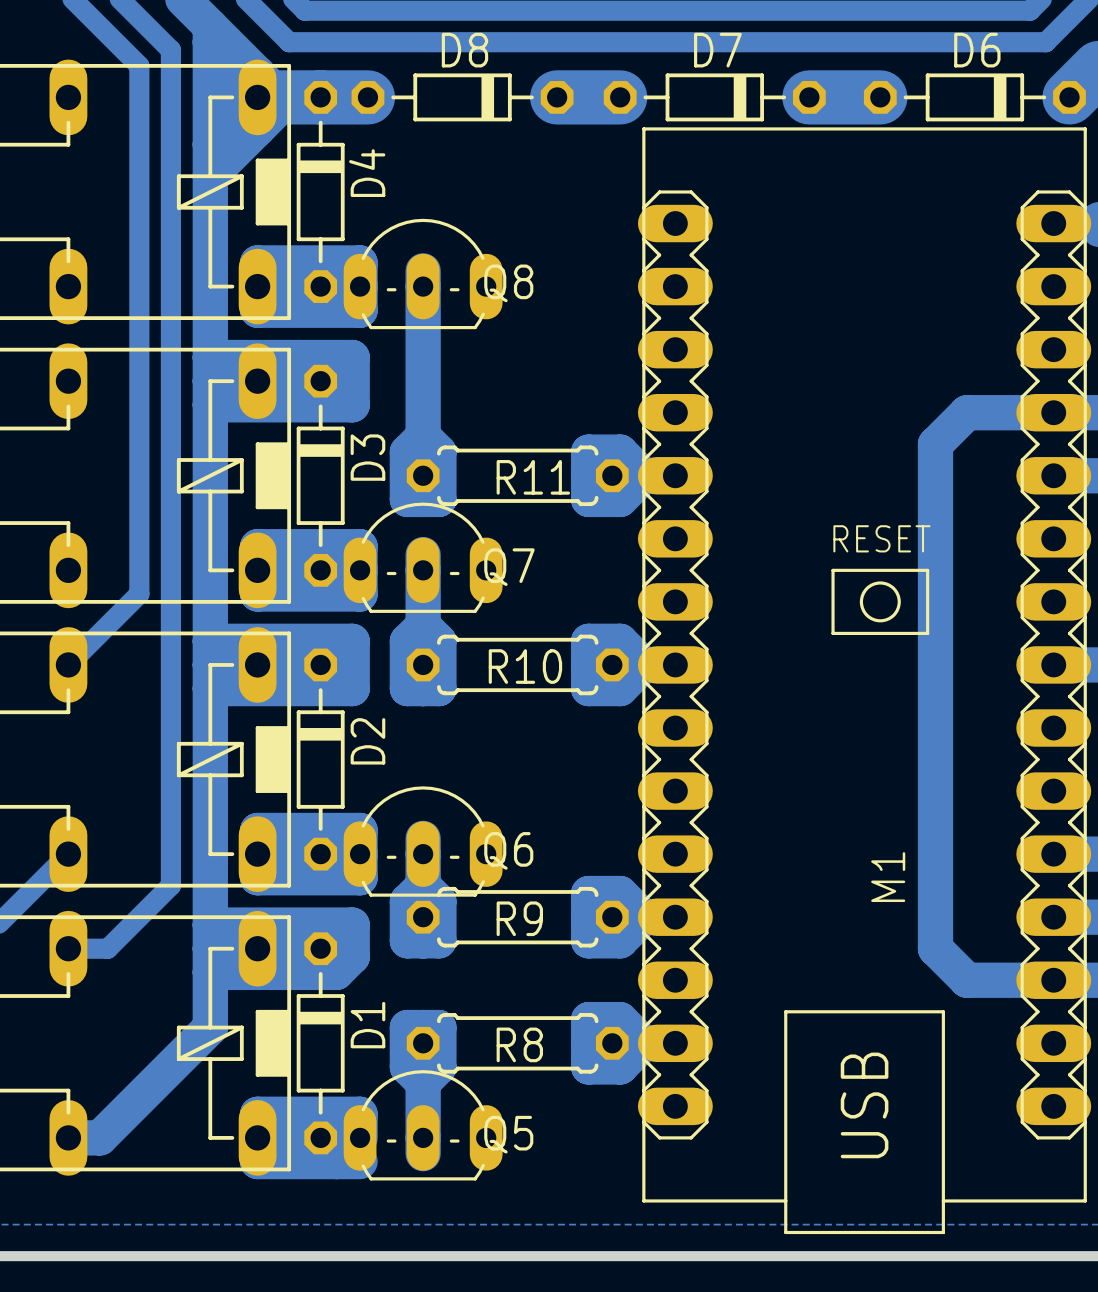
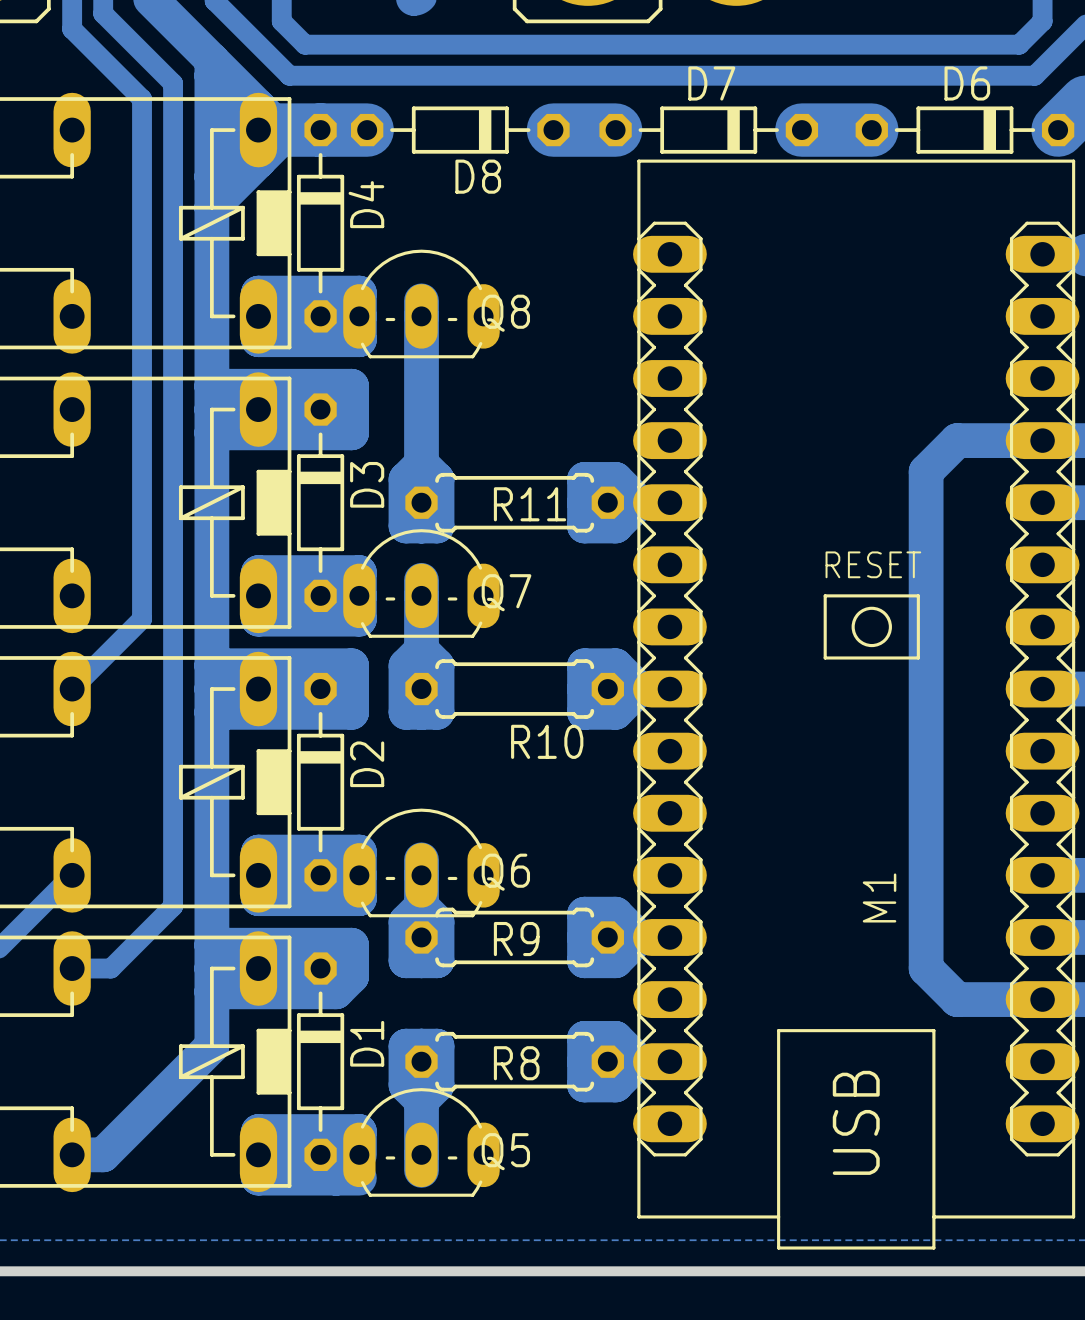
D8 name position: D8 (464, 50) -> D8 (478, 176)
R10 name position: R10 (525, 666) -> R10 (547, 741)

